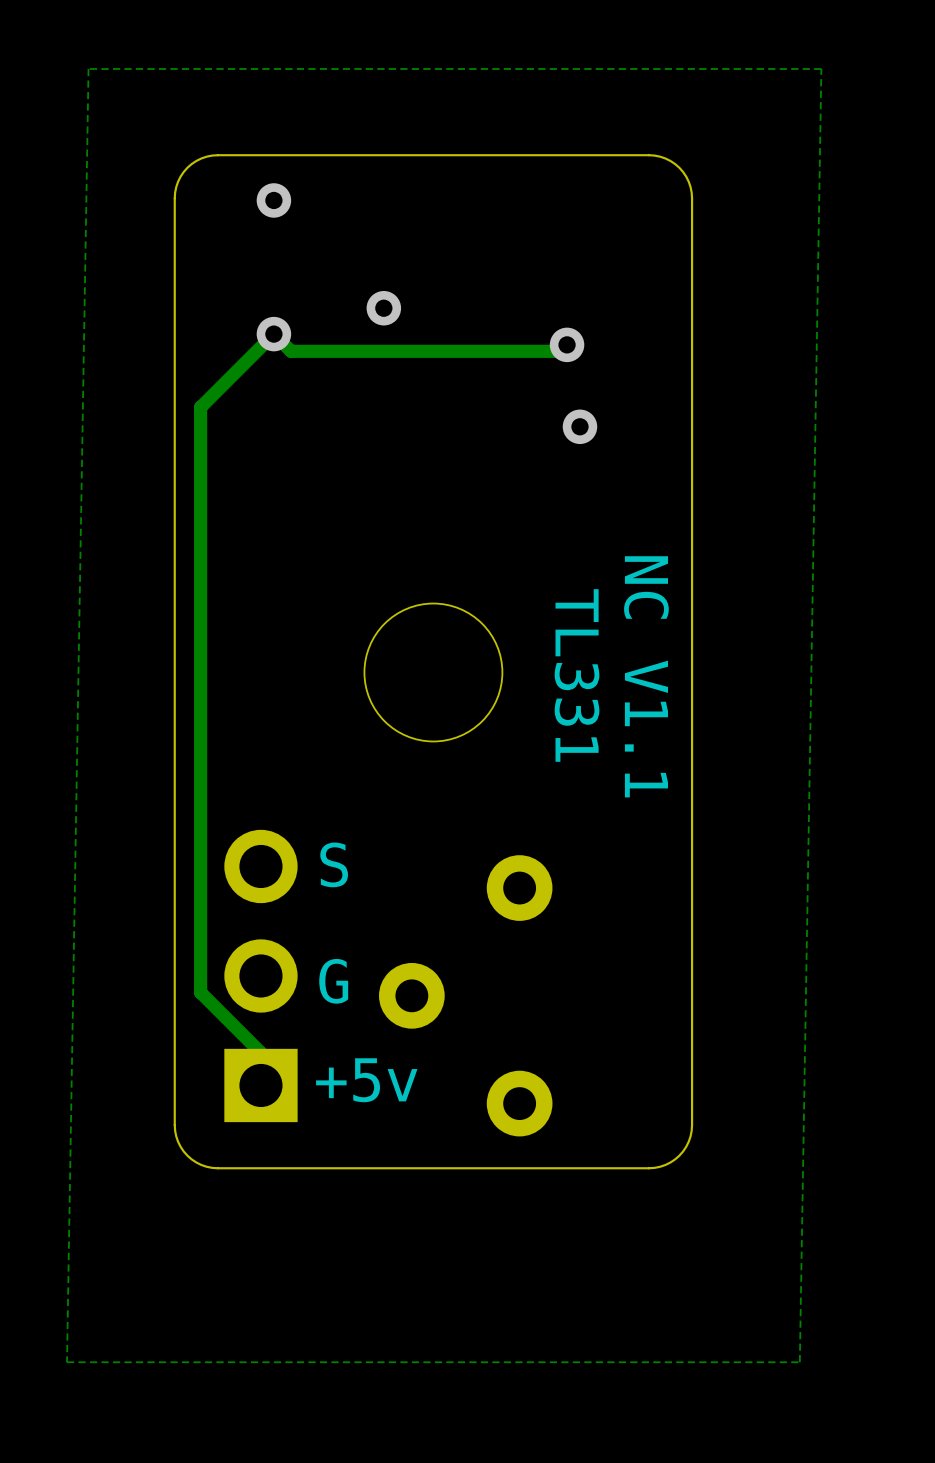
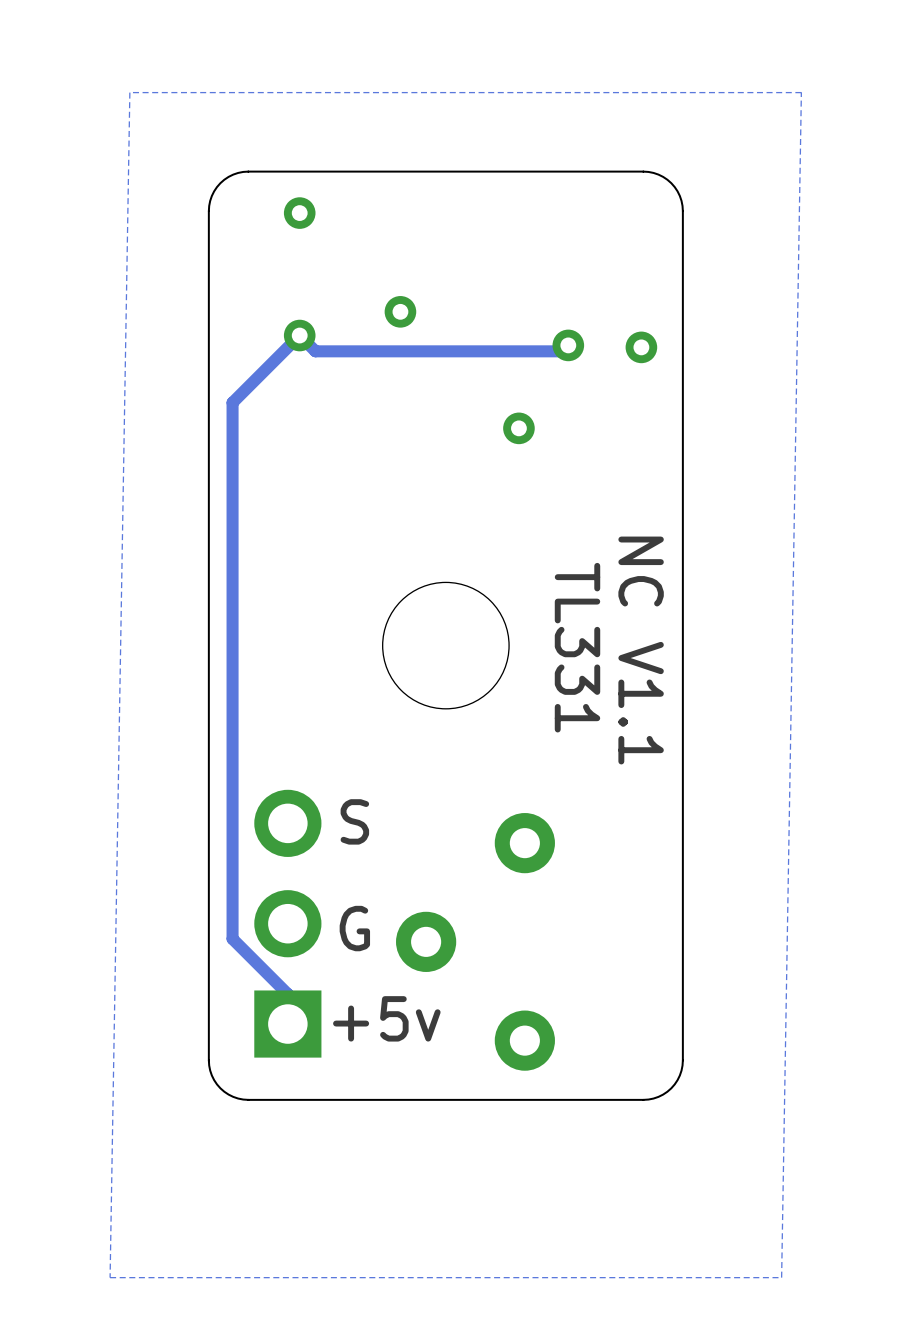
via: none -> (641, 347)
via: (579, 426) -> none
via: none -> (518, 428)

